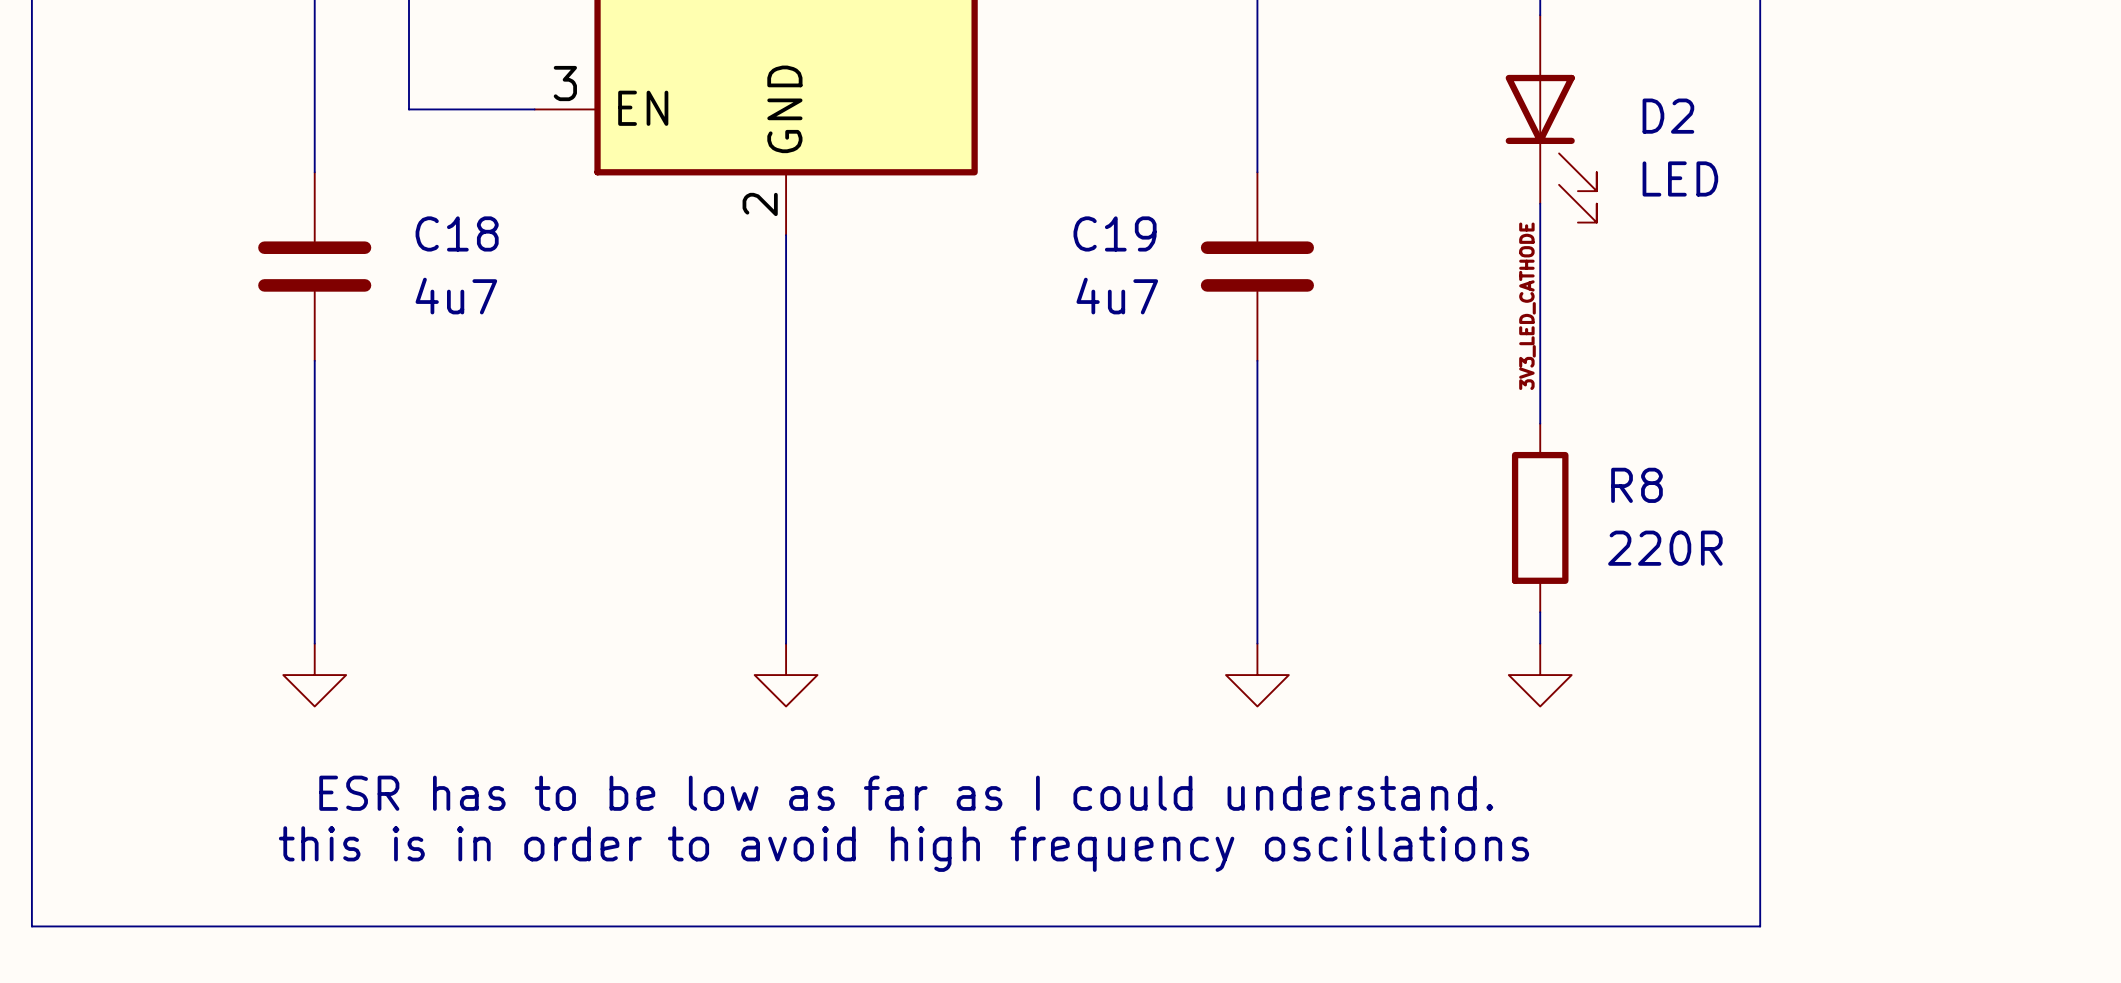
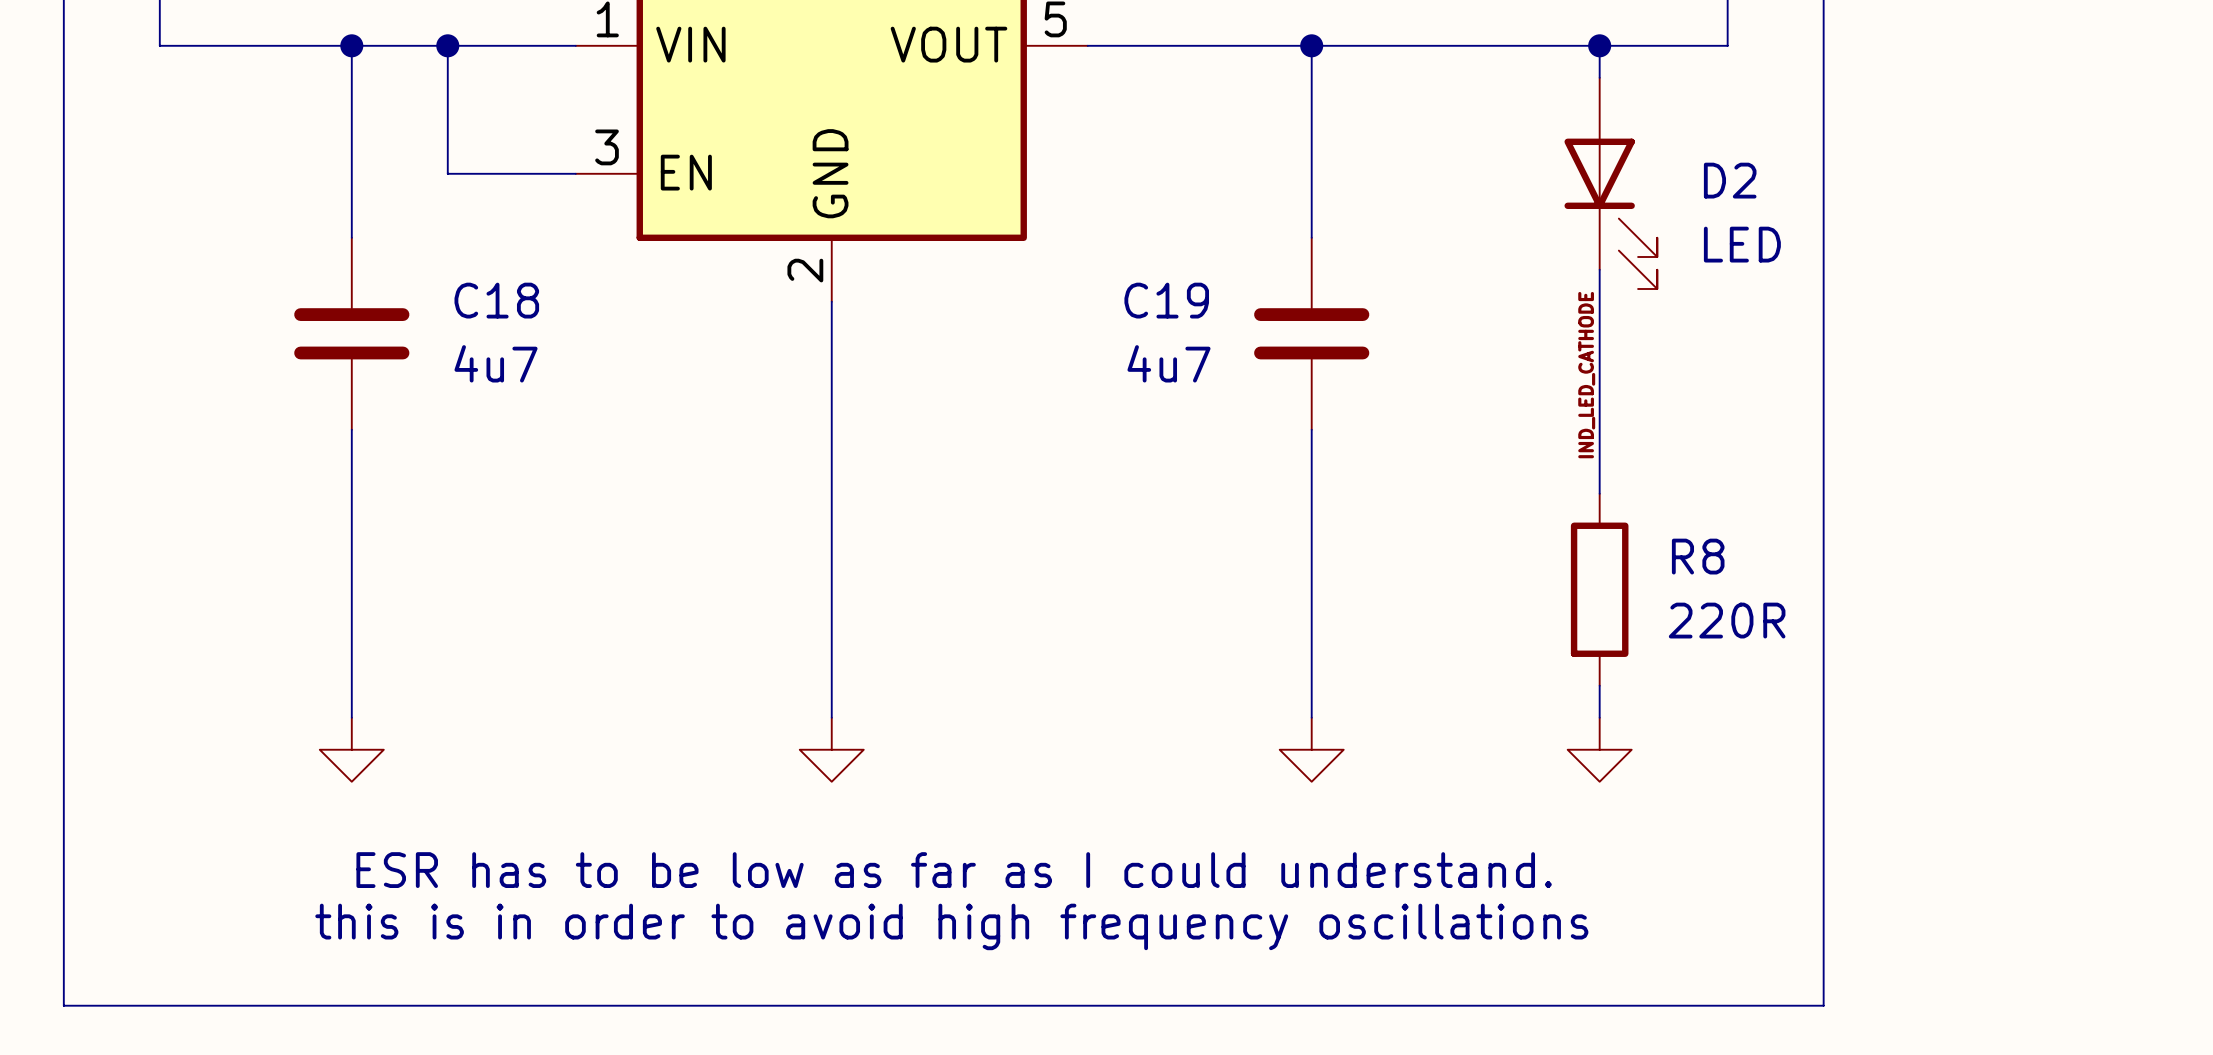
label: 3V3_LED_CATHODE (1527, 306) -> IND_LED_CATHODE (1586, 375)

